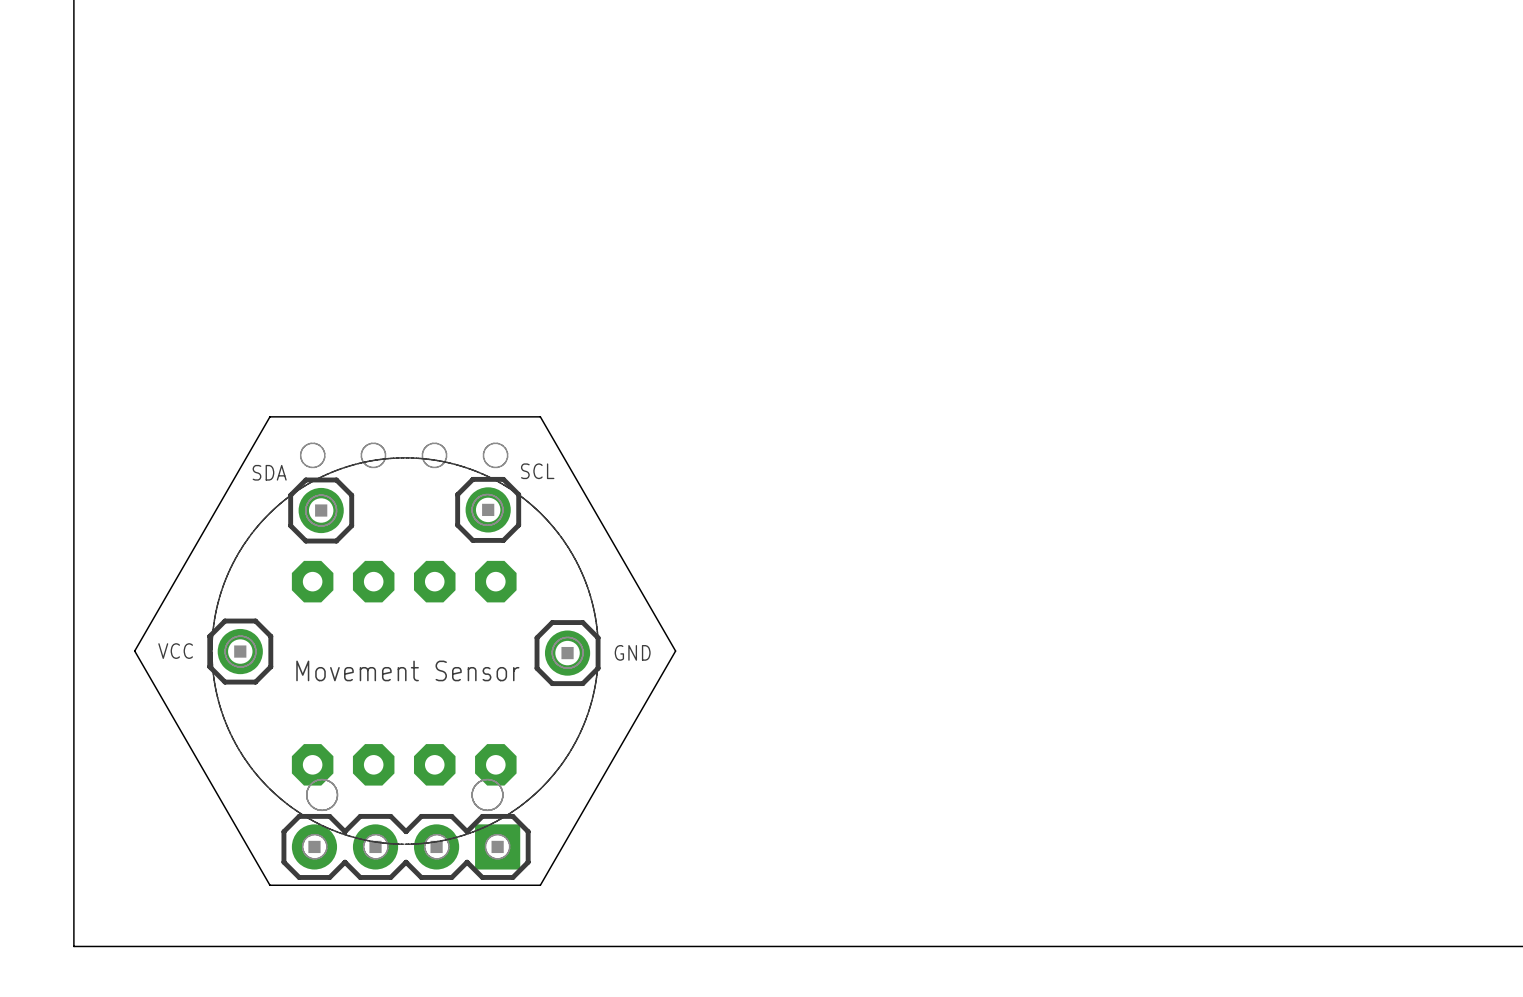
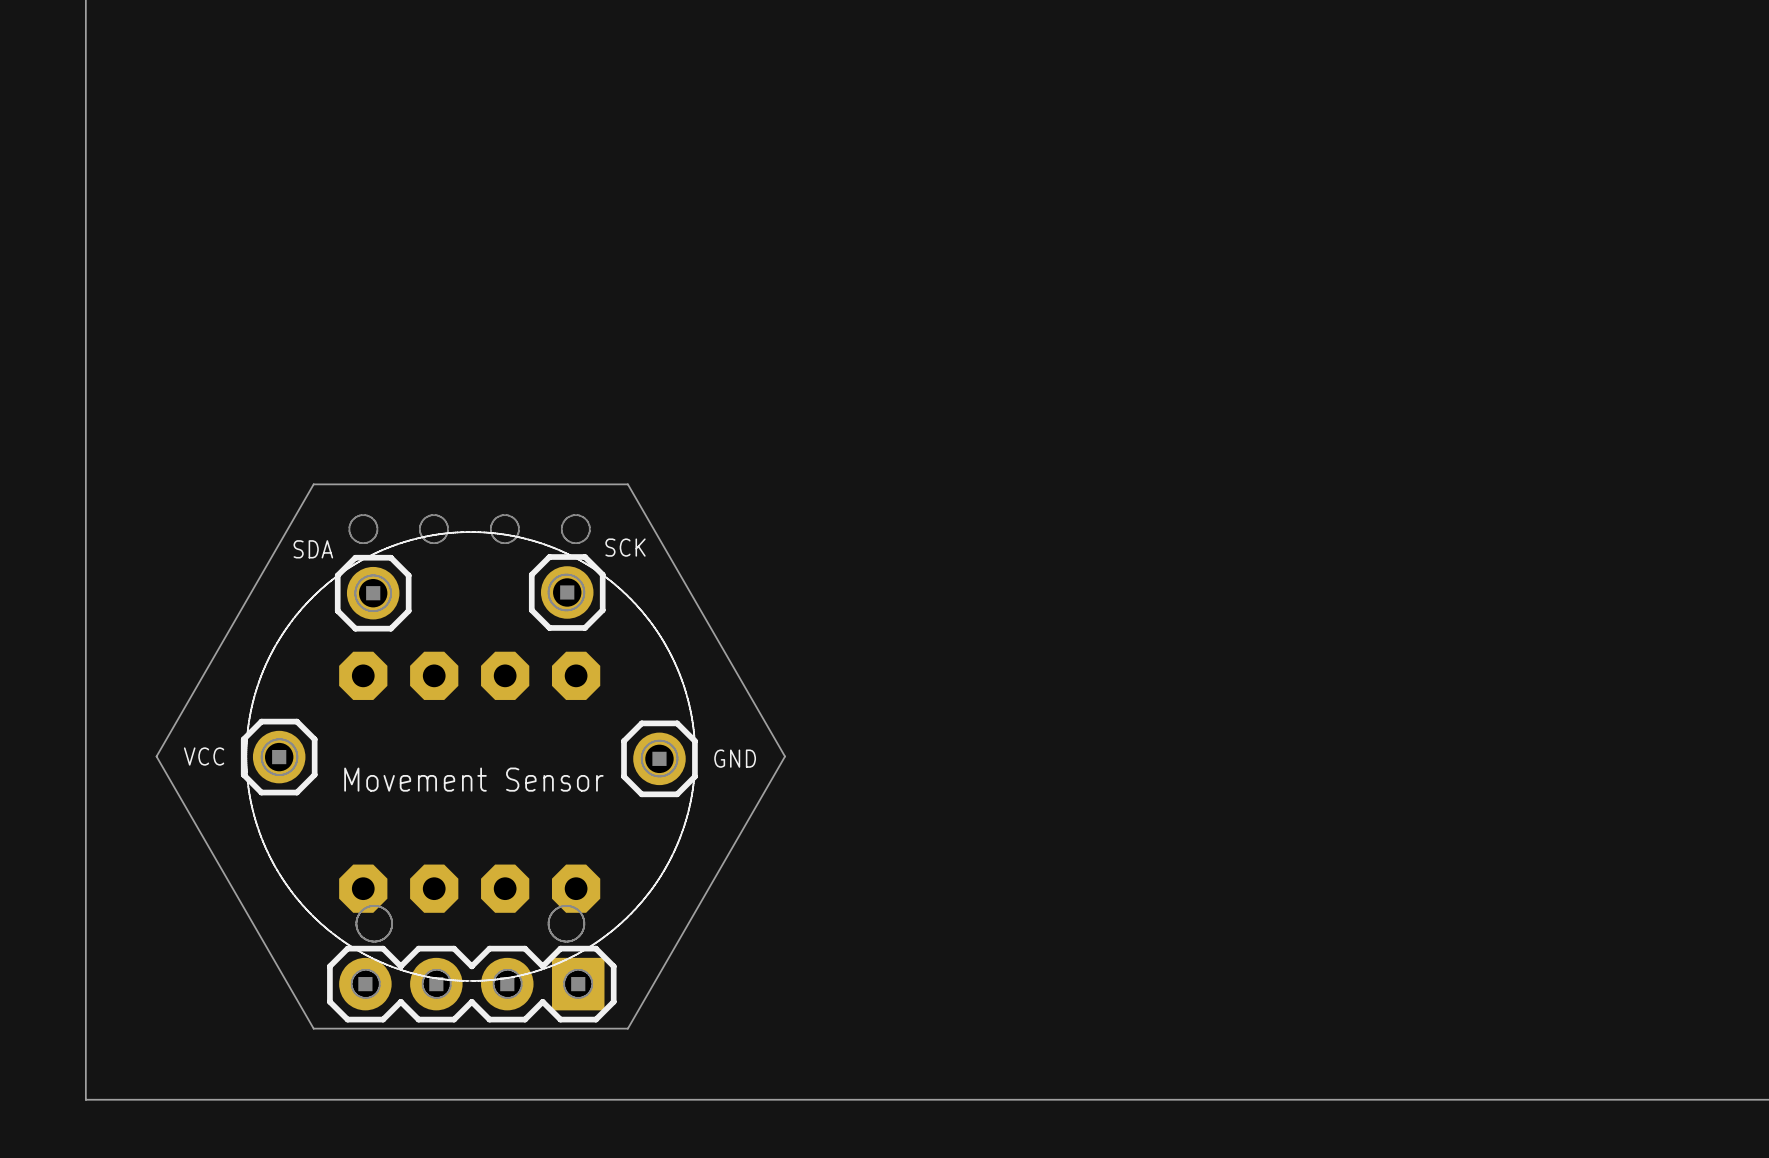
text: SCL (537, 471) -> SCK (625, 547)

